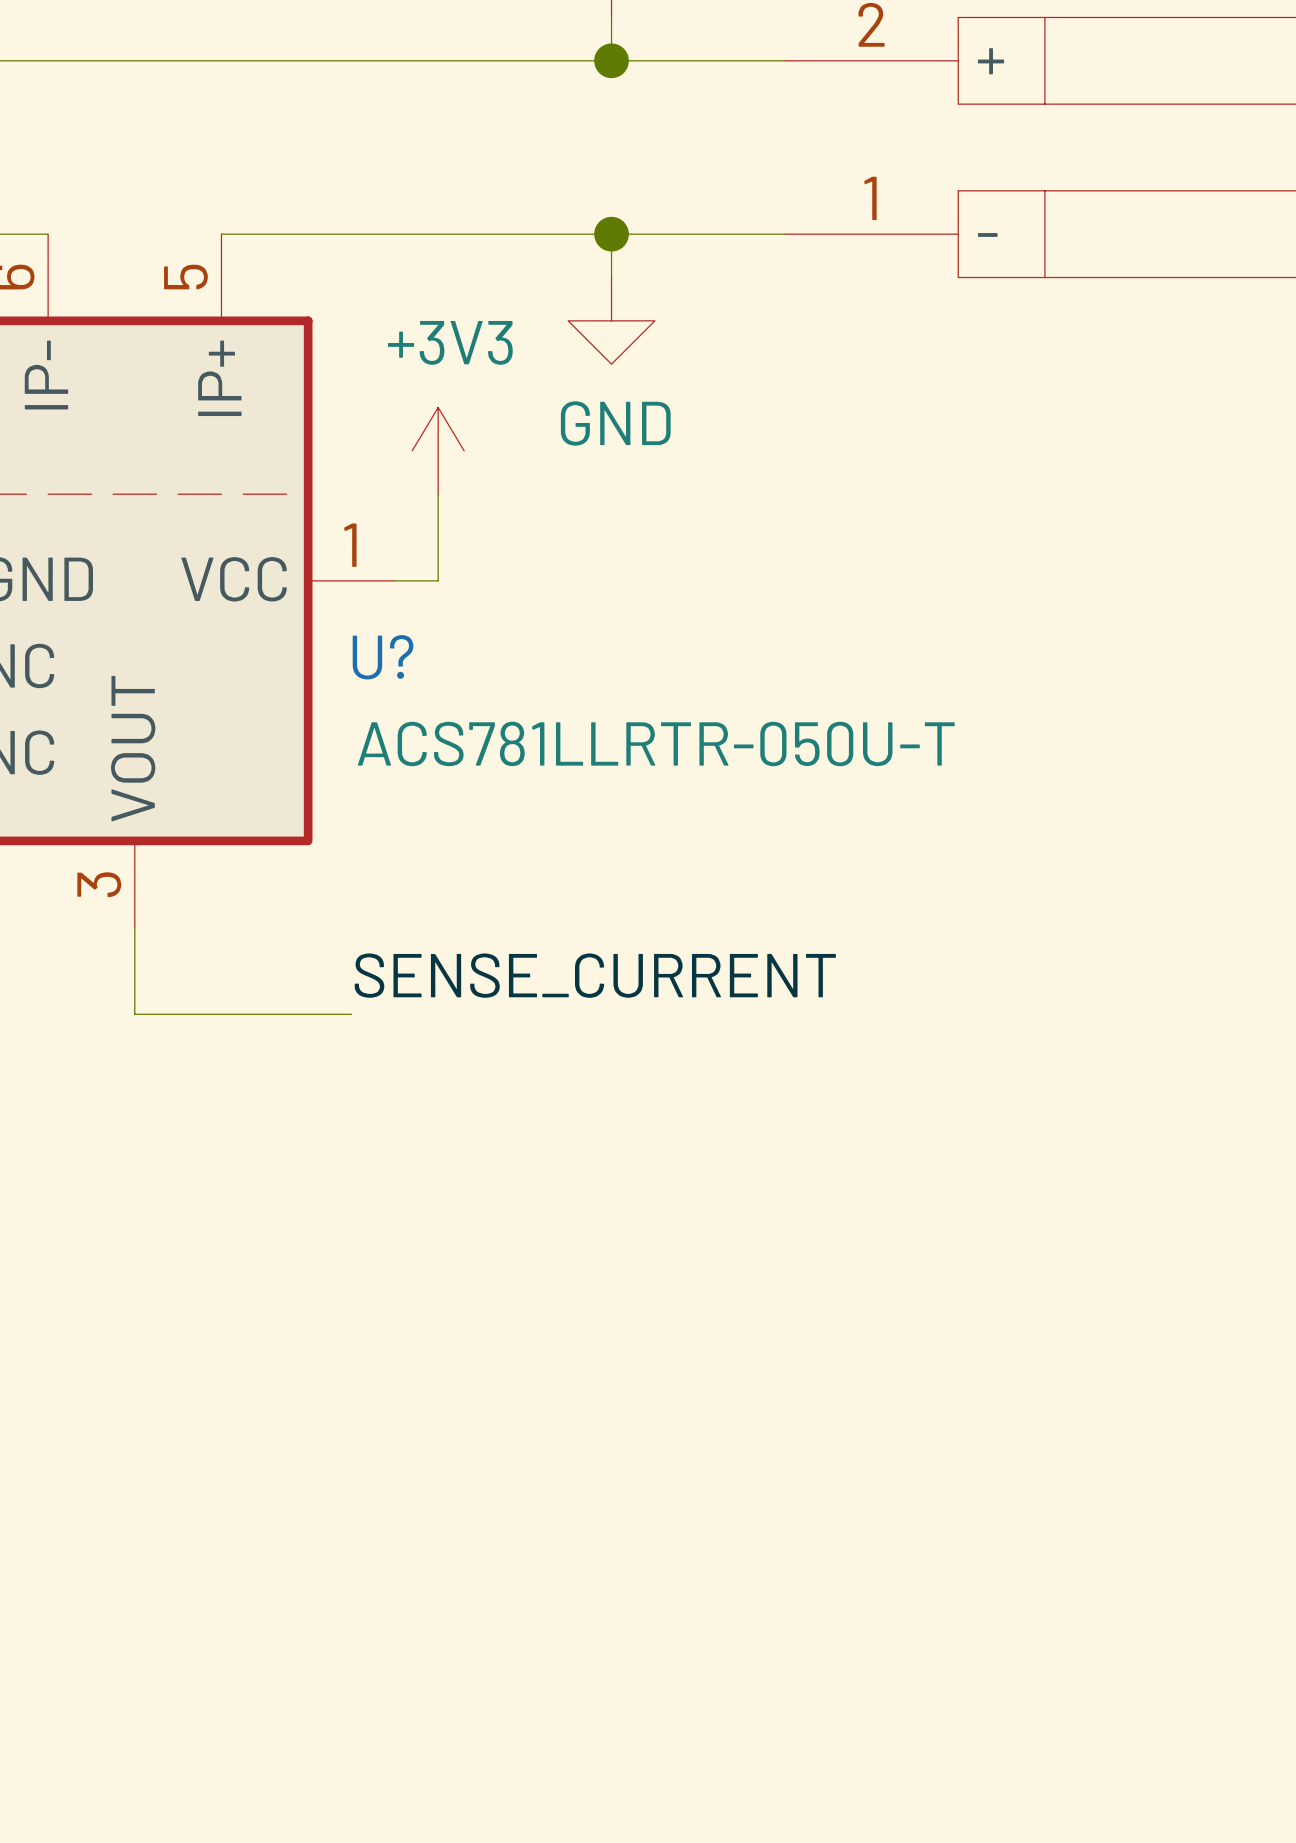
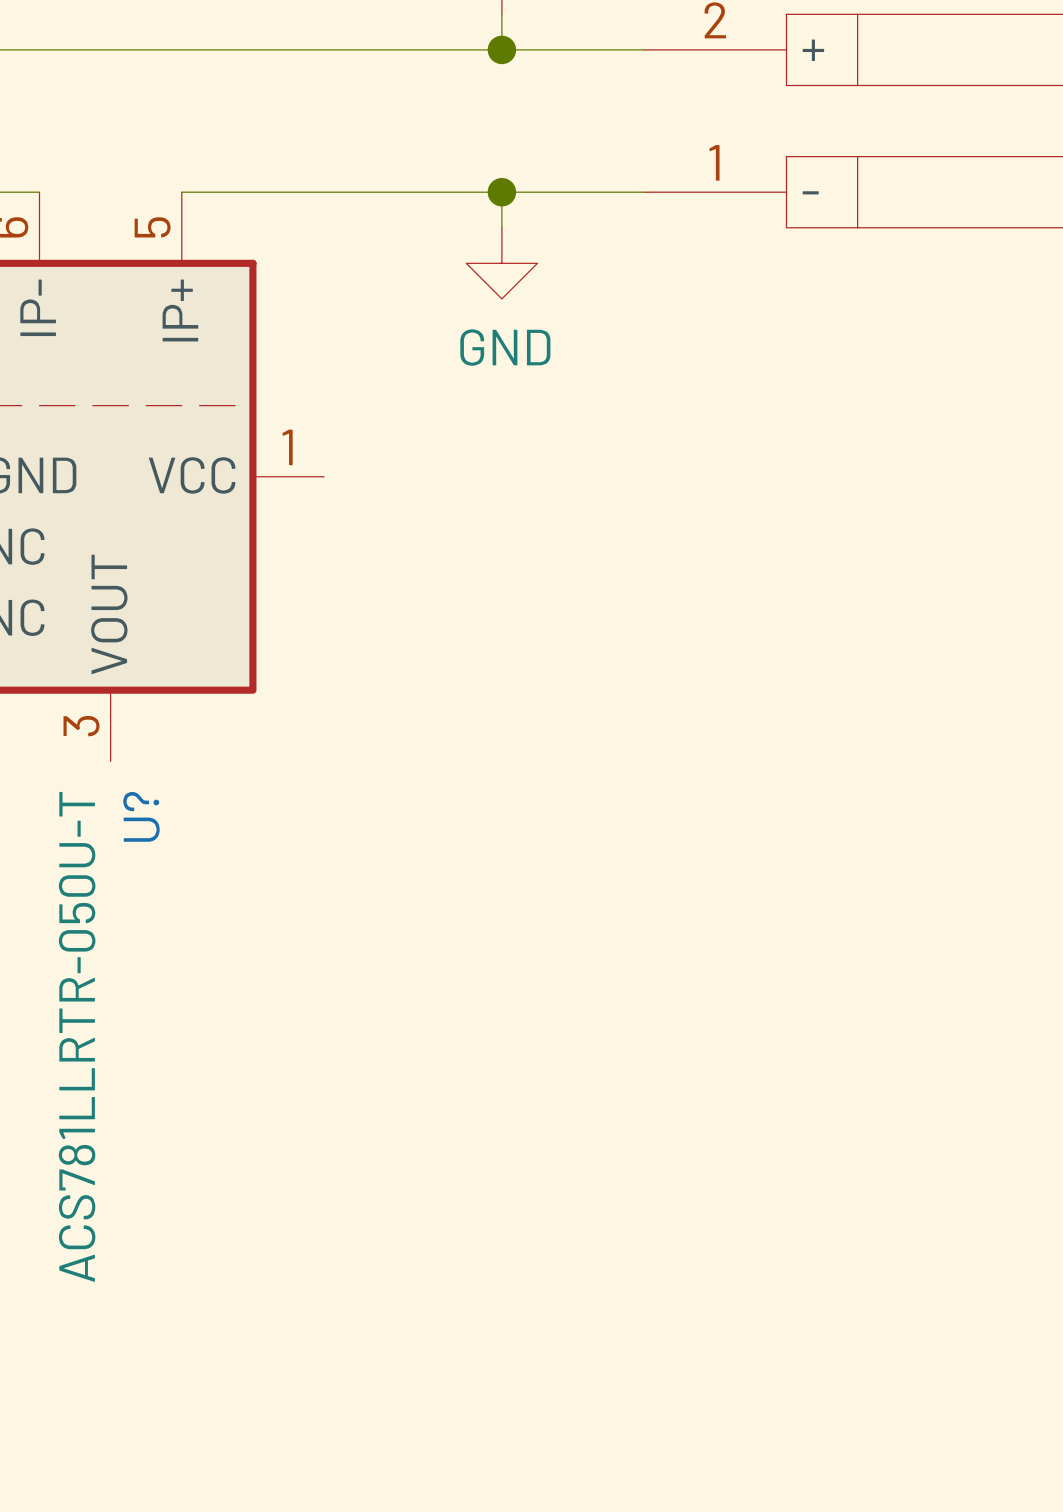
power symbol: +3V3 (438, 450) -> none
wire: (438, 494) (438, 580) (394, 580) -> none
U? name rotation: 0° (383, 657) -> 90° counterclockwise (141, 816)
U? name position: U? (383, 657) -> U? (141, 816)
U? value rotation: 0° (656, 743) -> 90° counterclockwise (77, 1037)
U? value position: ACS781LLRTR-050U-T (656, 743) -> ACS781LLRTR-050U-T (77, 1037)
wire: (134, 927) (134, 1014) (351, 1014) -> none
label: SENSE_CURRENT (595, 975) -> none

